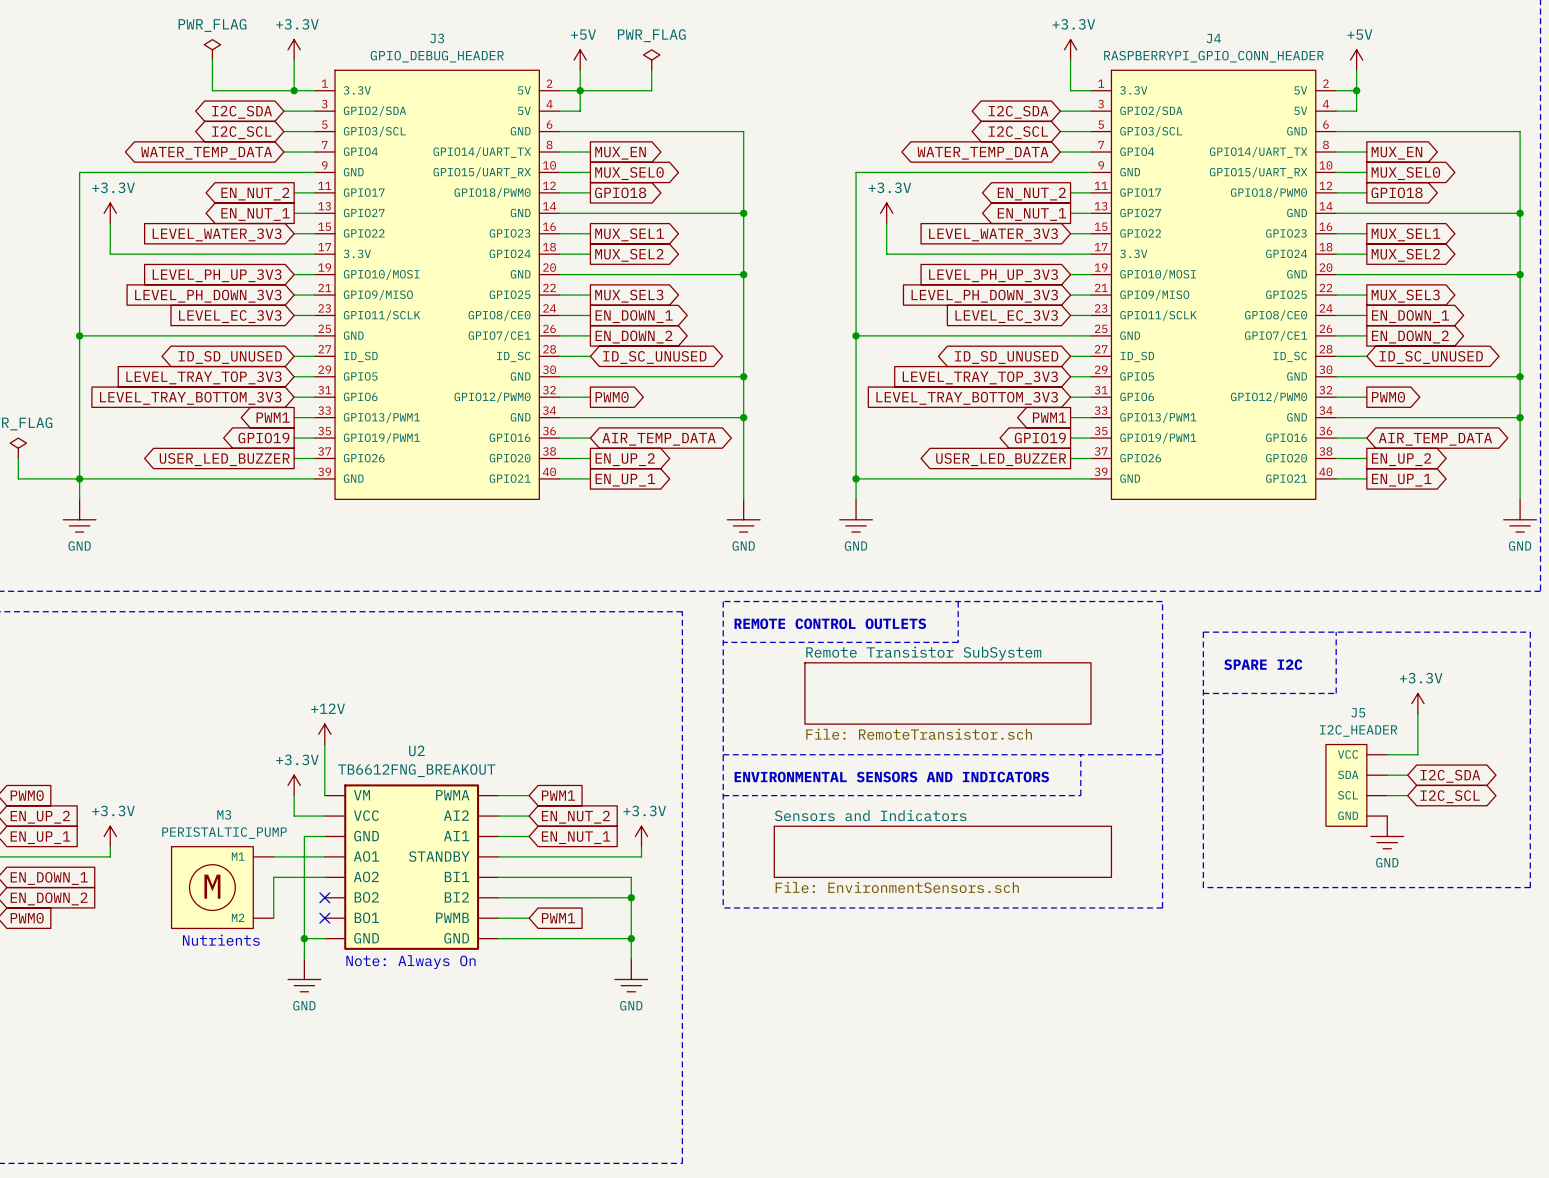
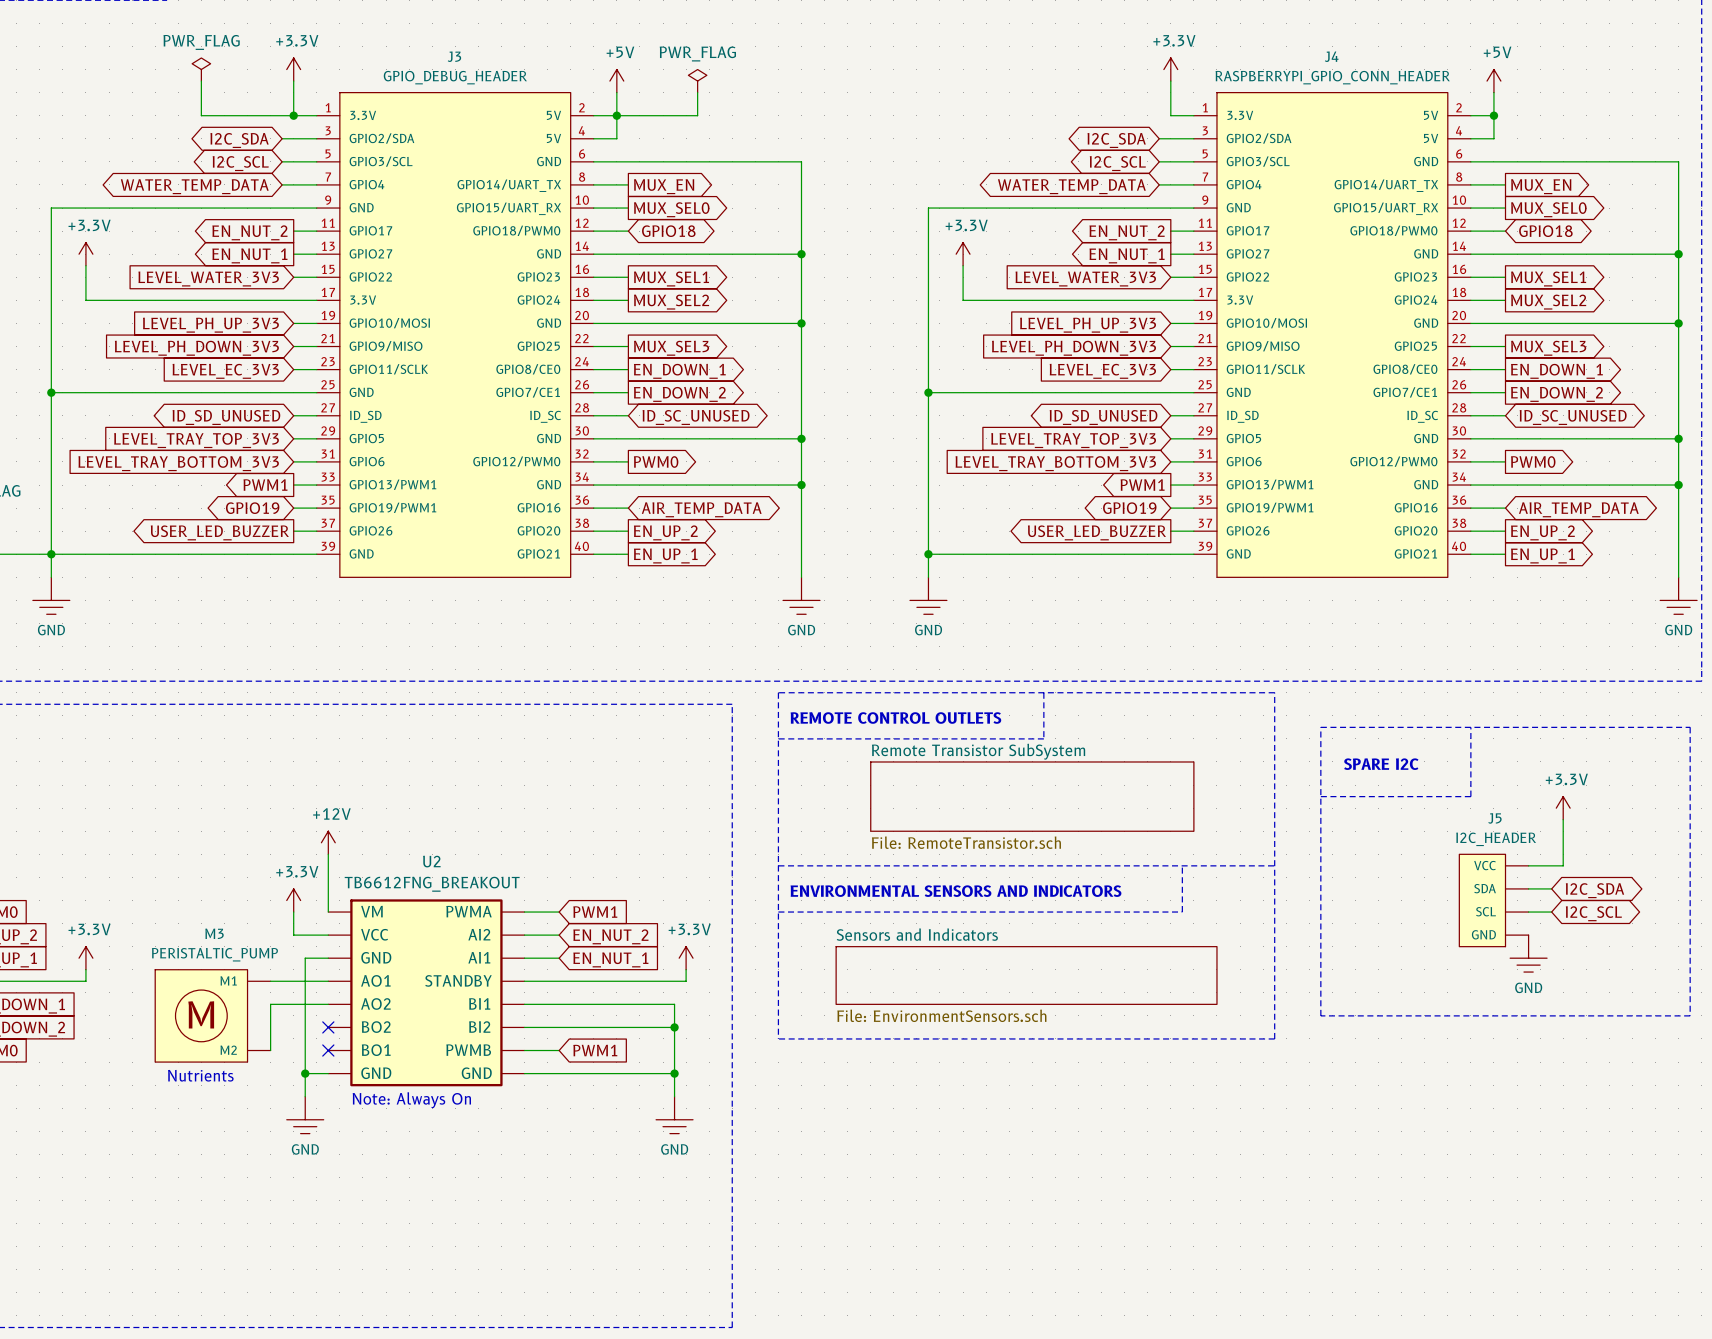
global label shape: output (620, 192) -> bidirectional (668, 231)
global label shape: output (1397, 192) -> bidirectional (1545, 231)
global label shape: output (263, 438) -> bidirectional (252, 508)
global label shape: output (1040, 438) -> bidirectional (1129, 508)

